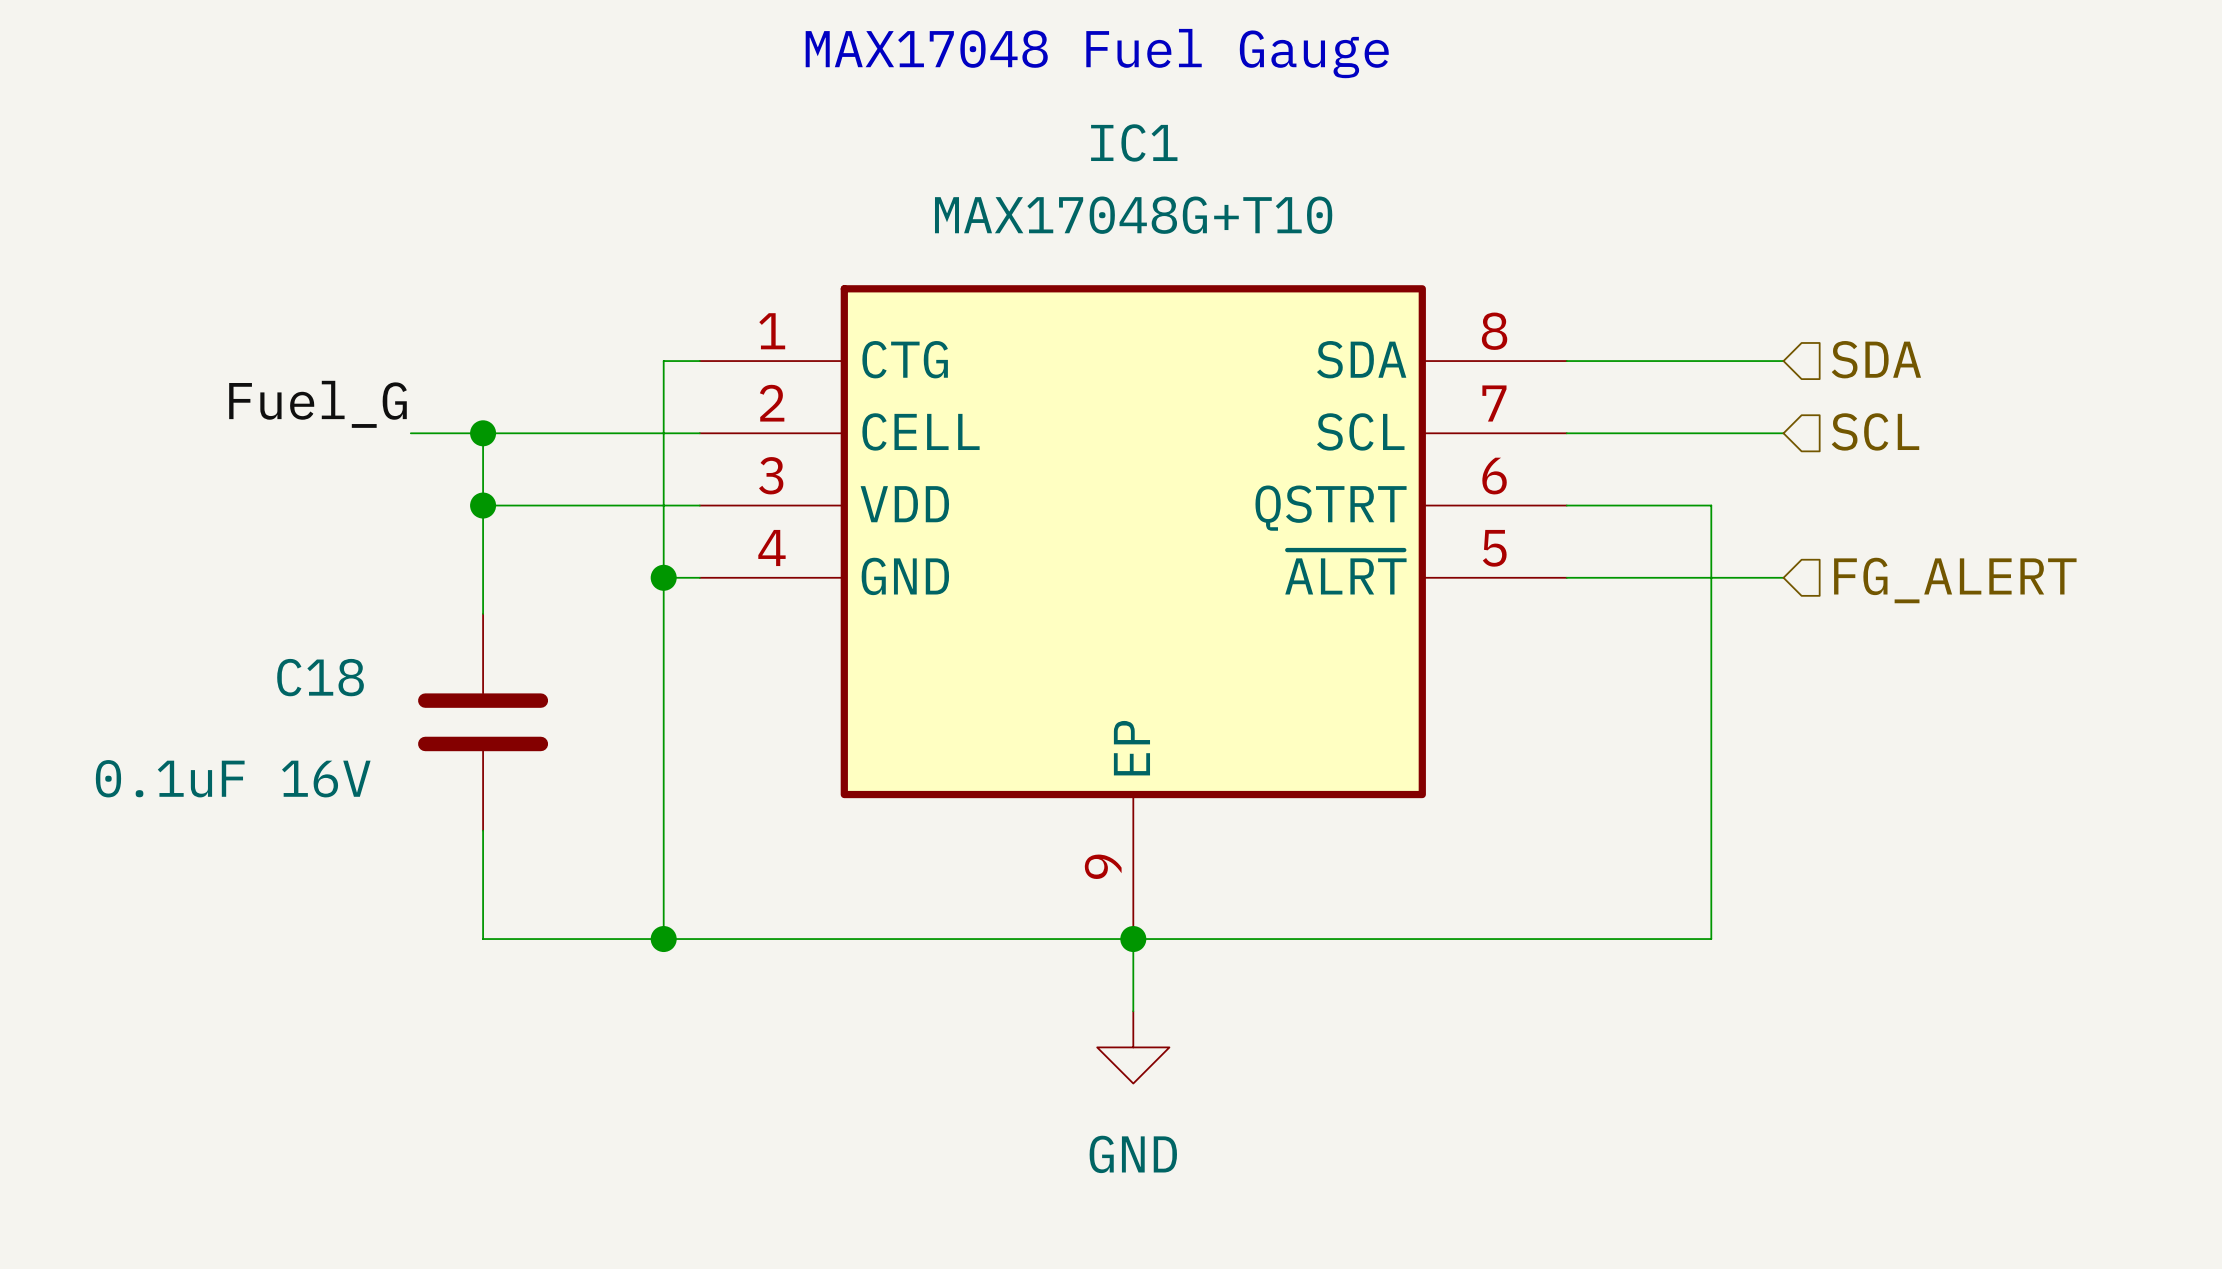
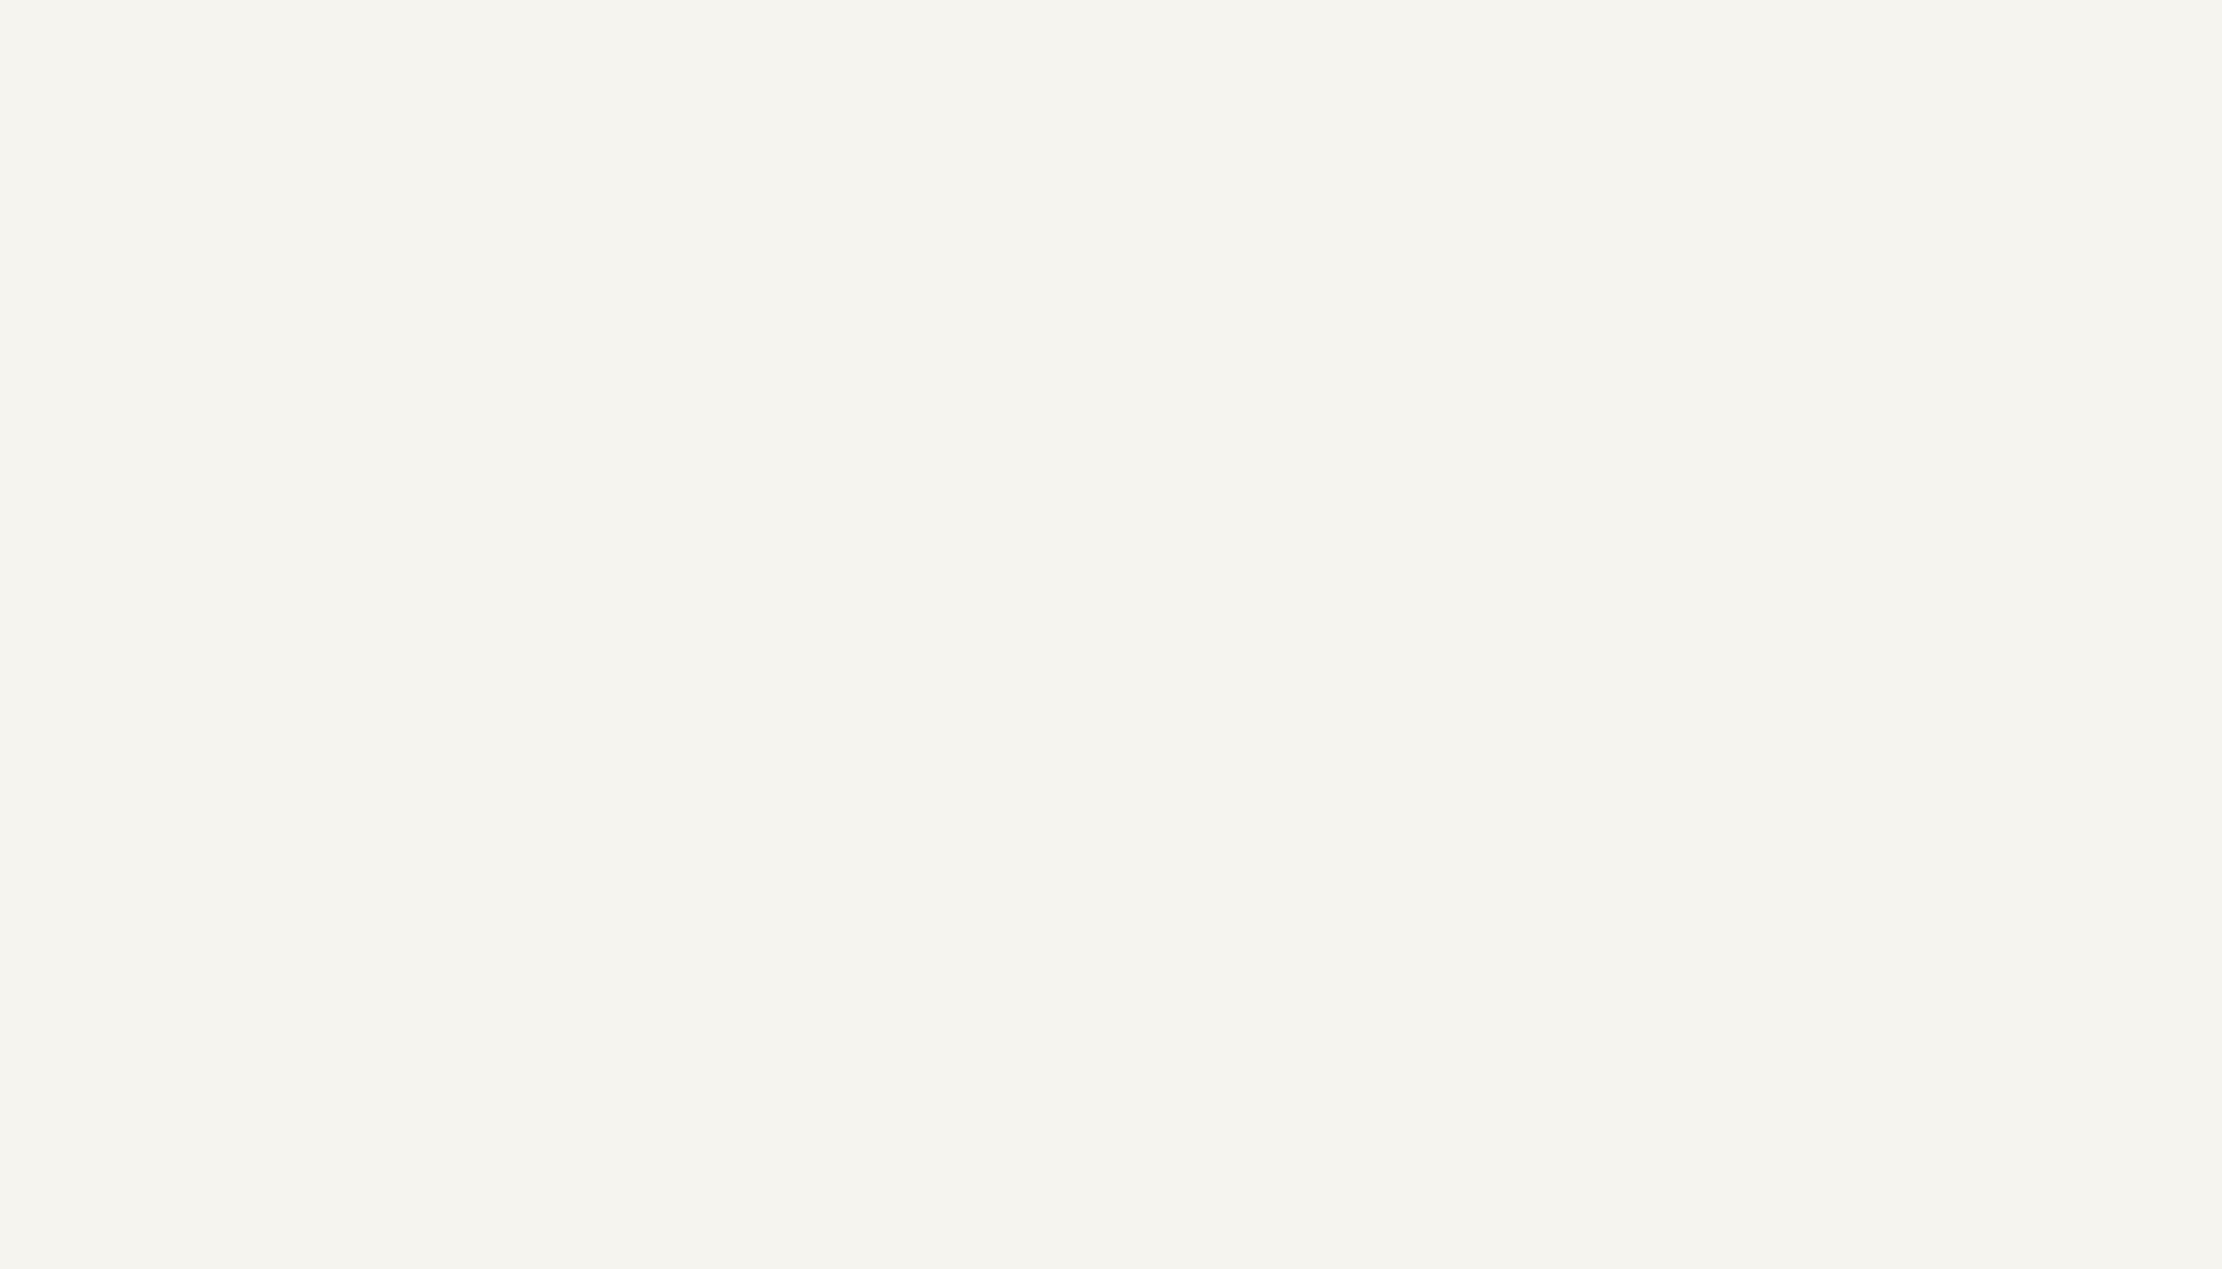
text: MAX17048 Fuel Gauge (1097, 53) -> none
hierarchical label: SDA (1876, 359) -> none
wire: (699, 361) (663, 361) (663, 939) -> none
wire: (1566, 361) (1783, 361) -> none
label: Fuel_G (317, 404) -> none
hierarchical label: SCL (1875, 431) -> none
wire: (410, 433) (699, 433) -> none
wire: (483, 433) (483, 613) -> none
junction: (483, 433) -> none
wire: (1566, 433) (1783, 433) -> none
wire: (483, 505) (699, 505) -> none
junction: (483, 505) -> none
wire: (1566, 505) (1711, 505) (1711, 939) (483, 939) (483, 830) -> none
wire: (663, 577) (699, 577) -> none
junction: (663, 577) -> none
wire: (1566, 577) (1783, 577) -> none
hierarchical label: FG_ALERT (1955, 580) -> none
IC1: MAX17048G+T10 (1133, 612) -> none
C18: 0.1uF 16V (483, 722) -> none
junction: (663, 939) -> none
wire: (1133, 939) (1133, 1011) -> none
junction: (1133, 939) -> none
power symbol: GND (1133, 1047) -> none

